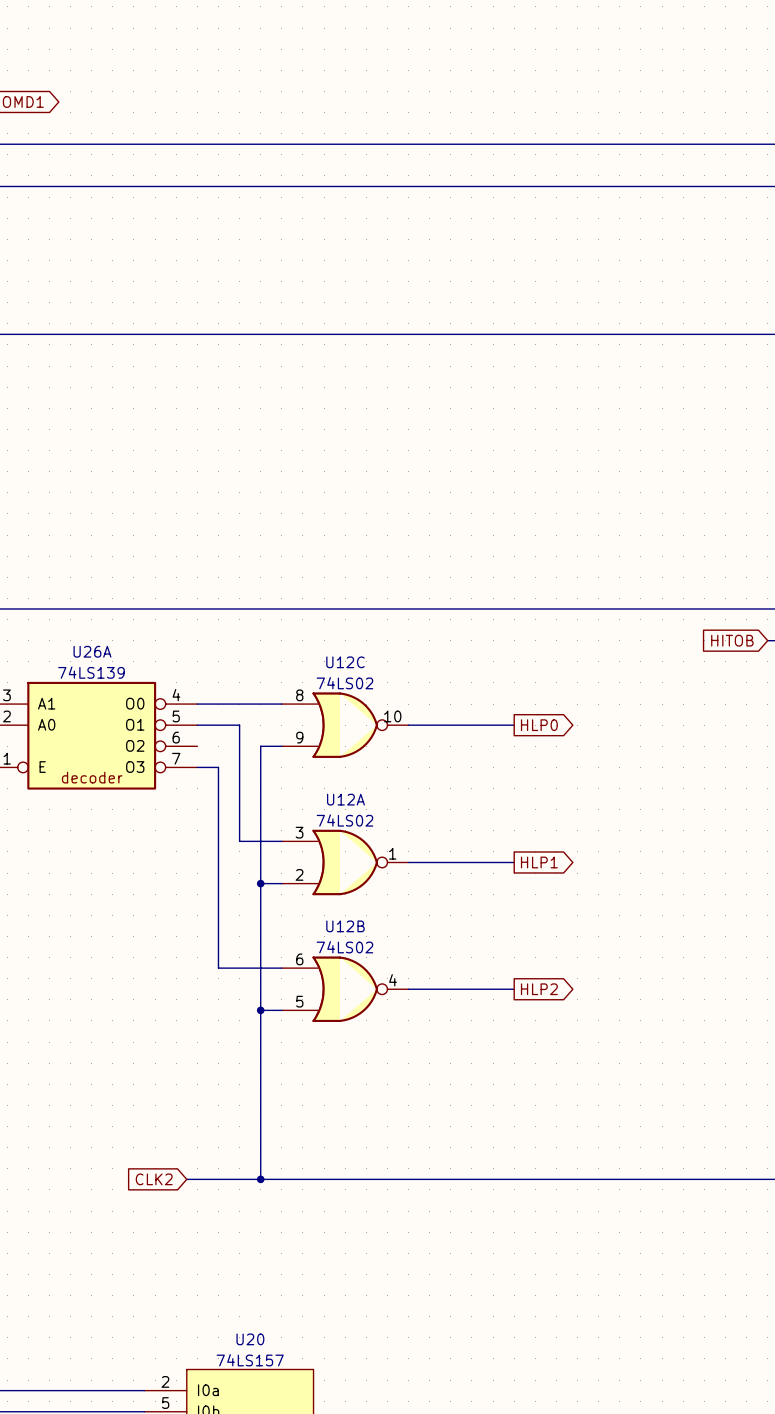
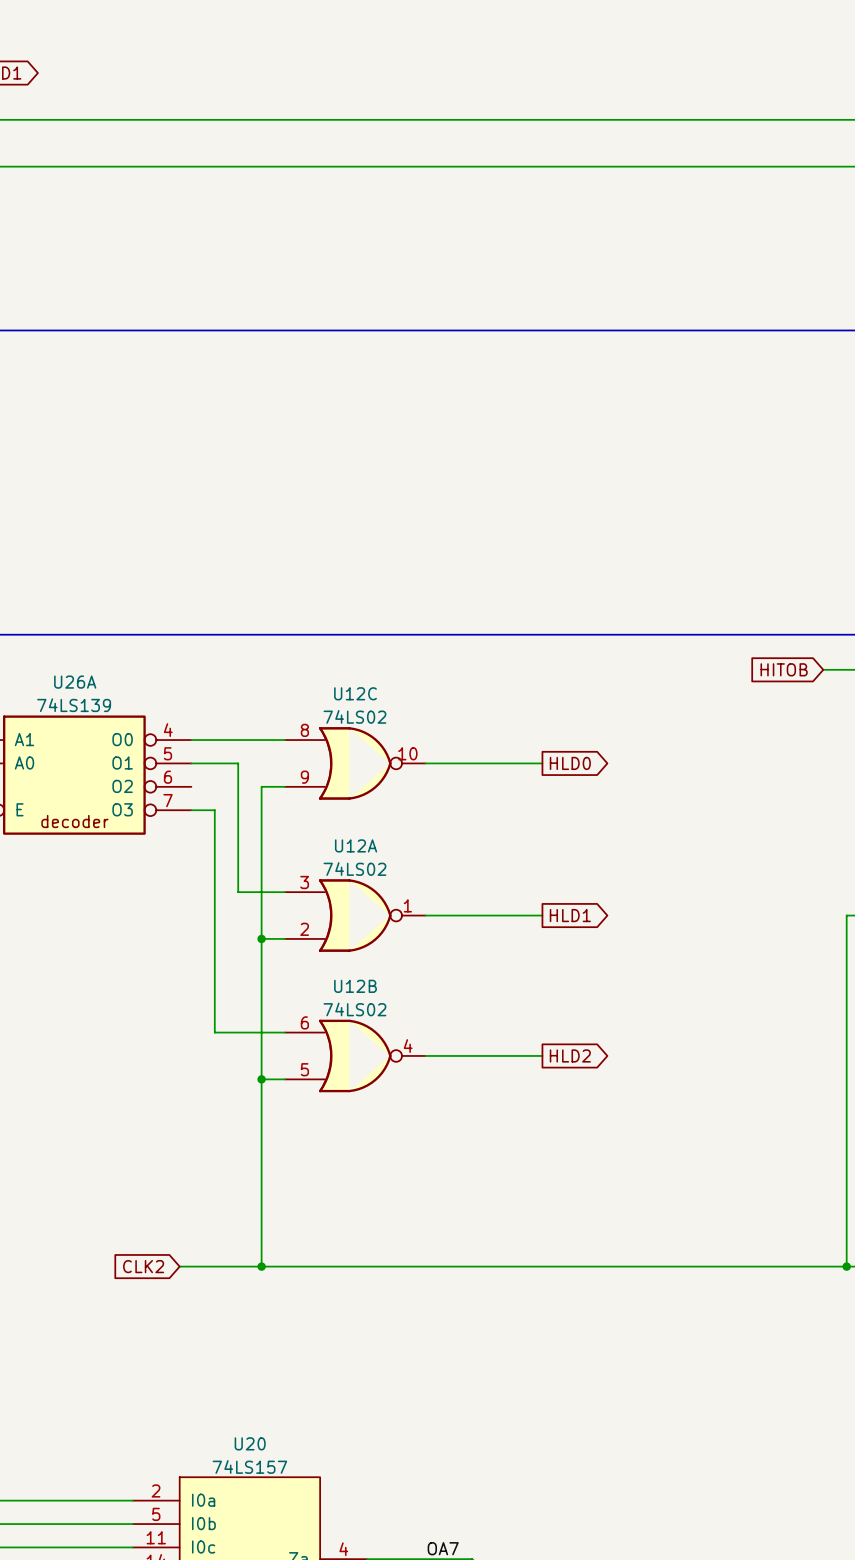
global label: HLP0 (539, 725) -> HLD0 (570, 763)
global label: HLP1 (539, 862) -> HLD1 (570, 915)
global label: HLP2 (539, 989) -> HLD2 (570, 1055)

